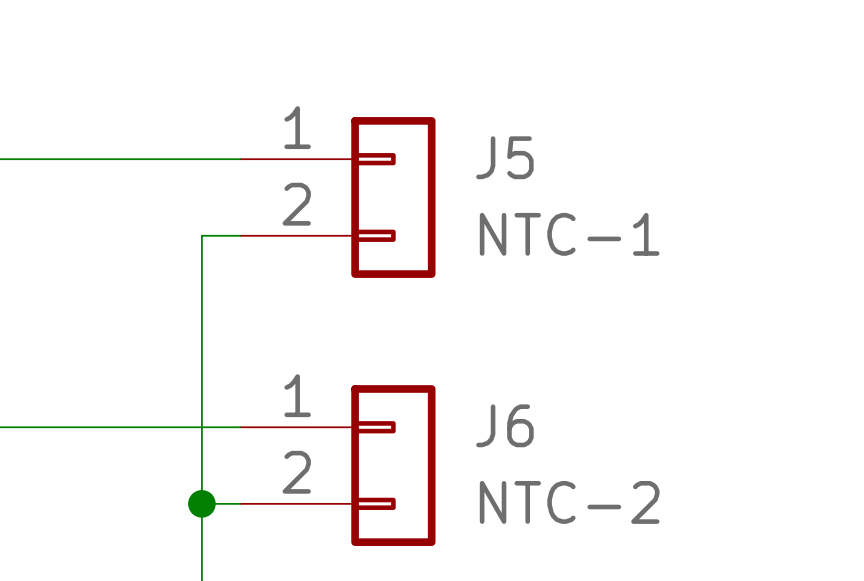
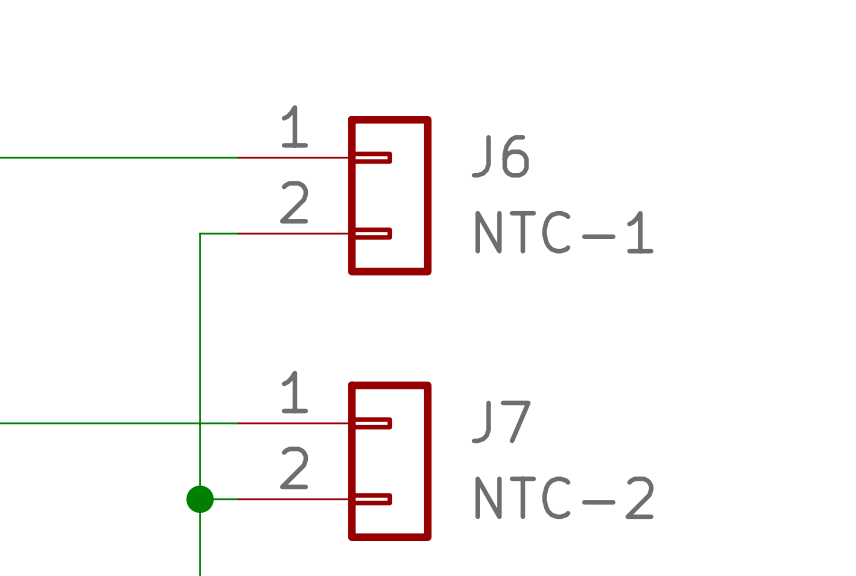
J5 name: J5 (504, 157) -> J6 (500, 156)
J6 name: J6 (504, 425) -> J7 (501, 421)

